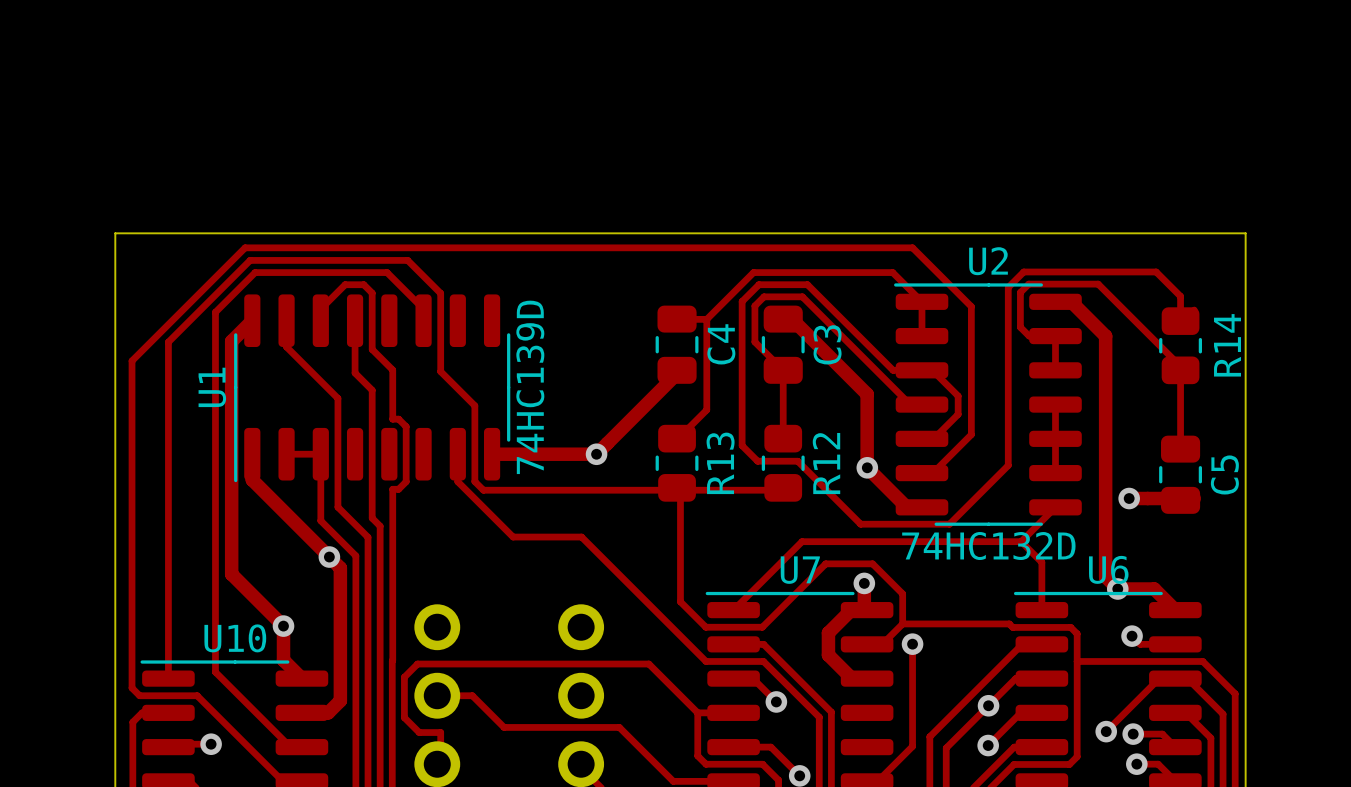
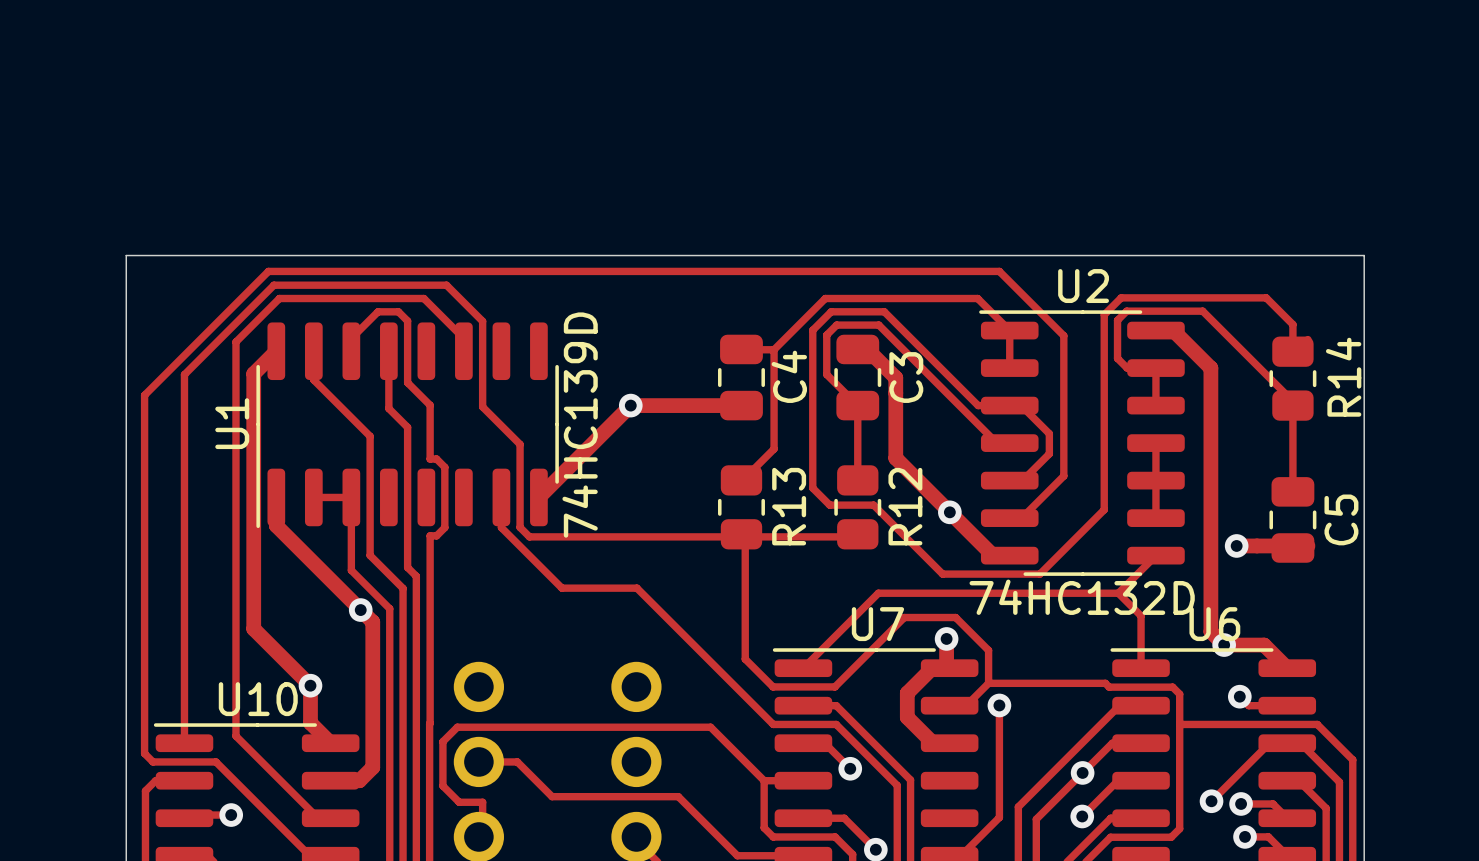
track: (817, 345) (867, 394) (867, 467) -> (895, 377) (895, 458) (949, 512)
track: (680, 370) (596, 454) -> (745, 405) (630, 405) (538, 497)
track: (492, 454) (596, 454) -> none
via position: (596, 454) -> (630, 405)

